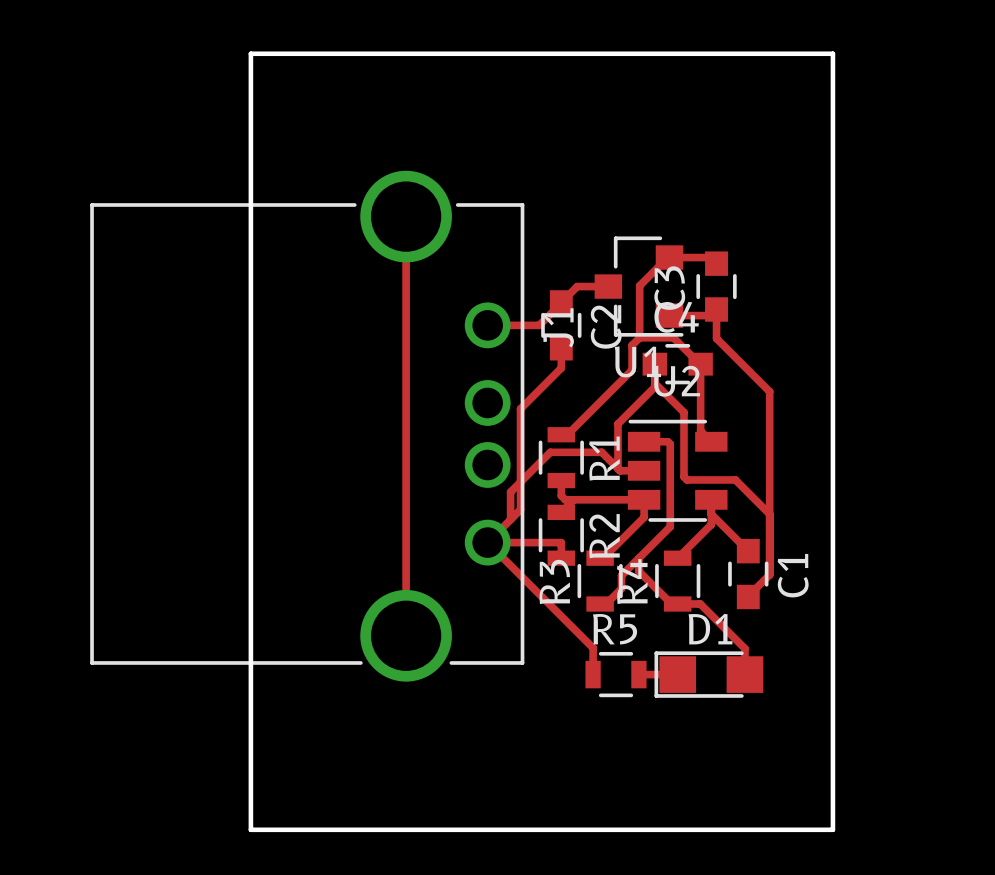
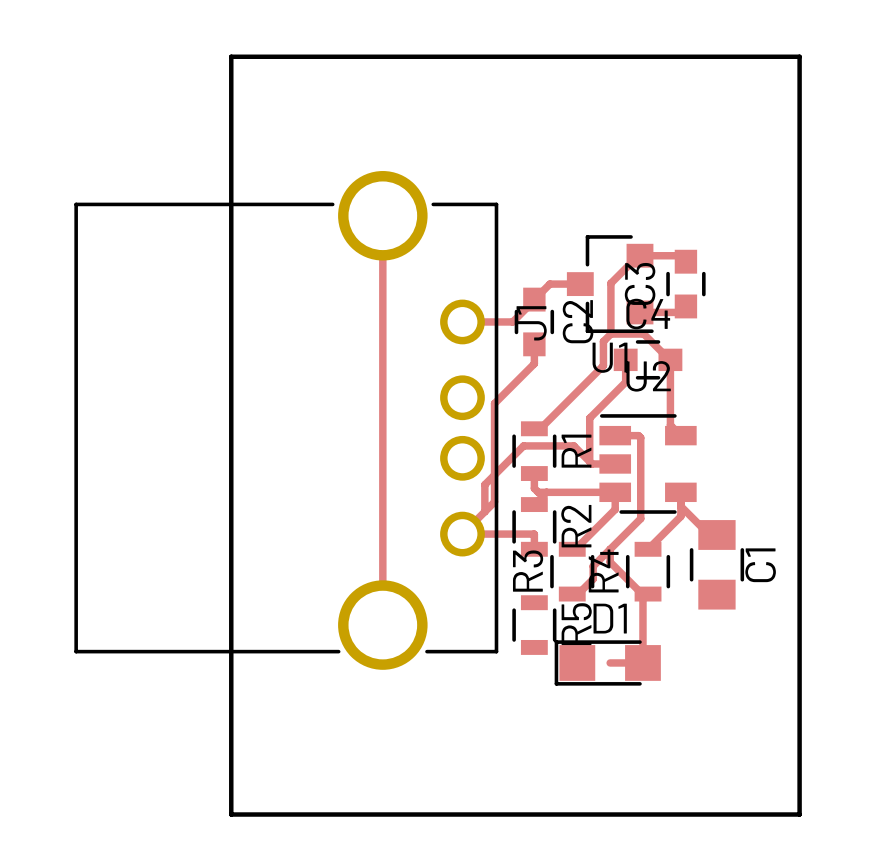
track: (716, 309) (716, 338) (769, 391) (769, 574) (748, 596) -> none
track: (654, 383) (683, 412) (683, 476) (687, 479) (735, 479) (769, 514) -> none
C1 footprint: [728, 538, 769, 610] -> [689, 520, 745, 610]
track: (487, 542) (593, 648) (593, 674) -> none
track: (677, 604) (700, 604) (744, 648) (744, 674) -> (648, 594) (642, 599) (642, 662)
R5 rotation: 0° (616, 674) -> 90° clockwise (534, 625)
R5 position: (616, 674) -> (534, 625)
D1 position: (708, 674) -> (607, 662)

